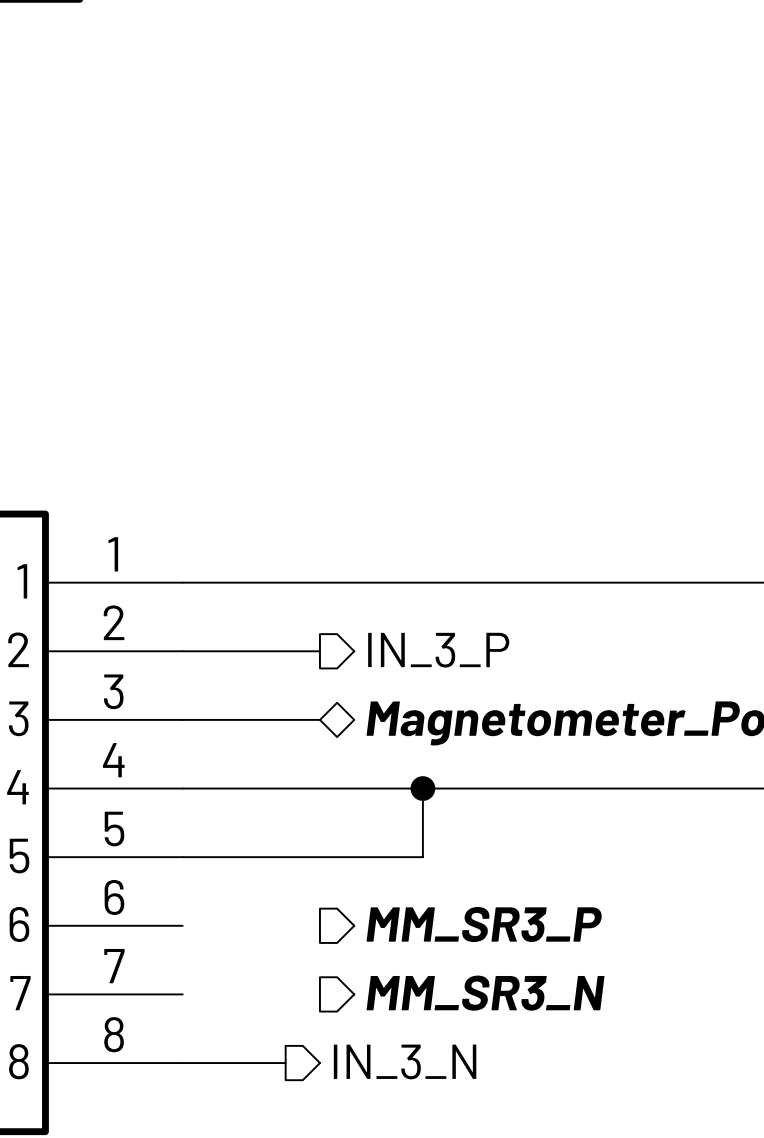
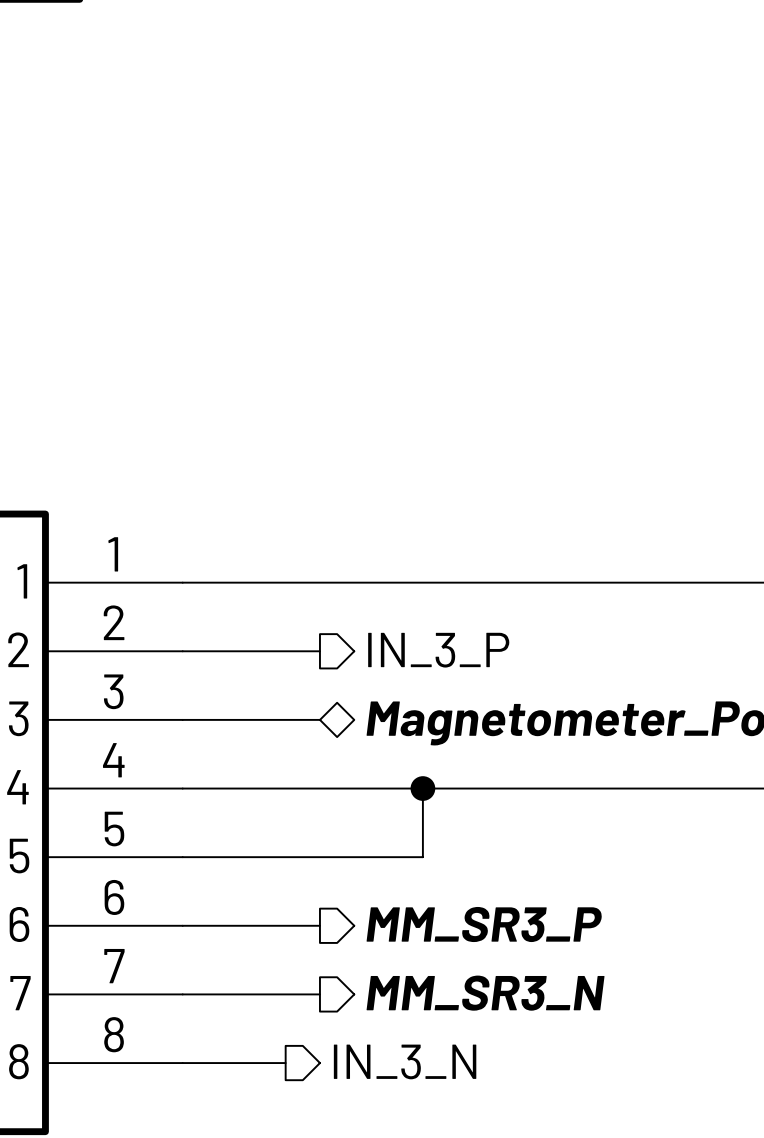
wire: none -> (182, 925) (319, 925)
wire: none -> (182, 994) (319, 994)

